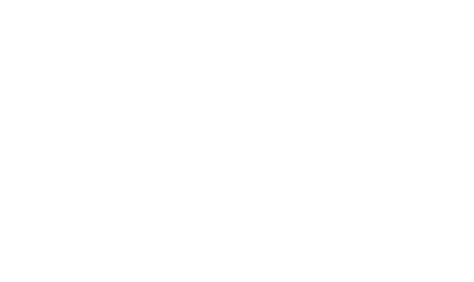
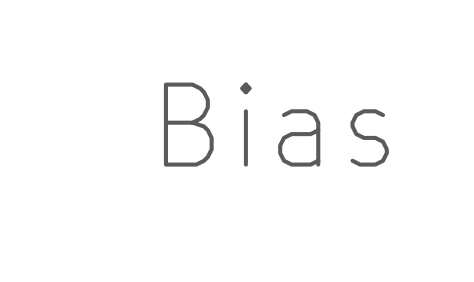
text: none -> Bias (276, 124)

